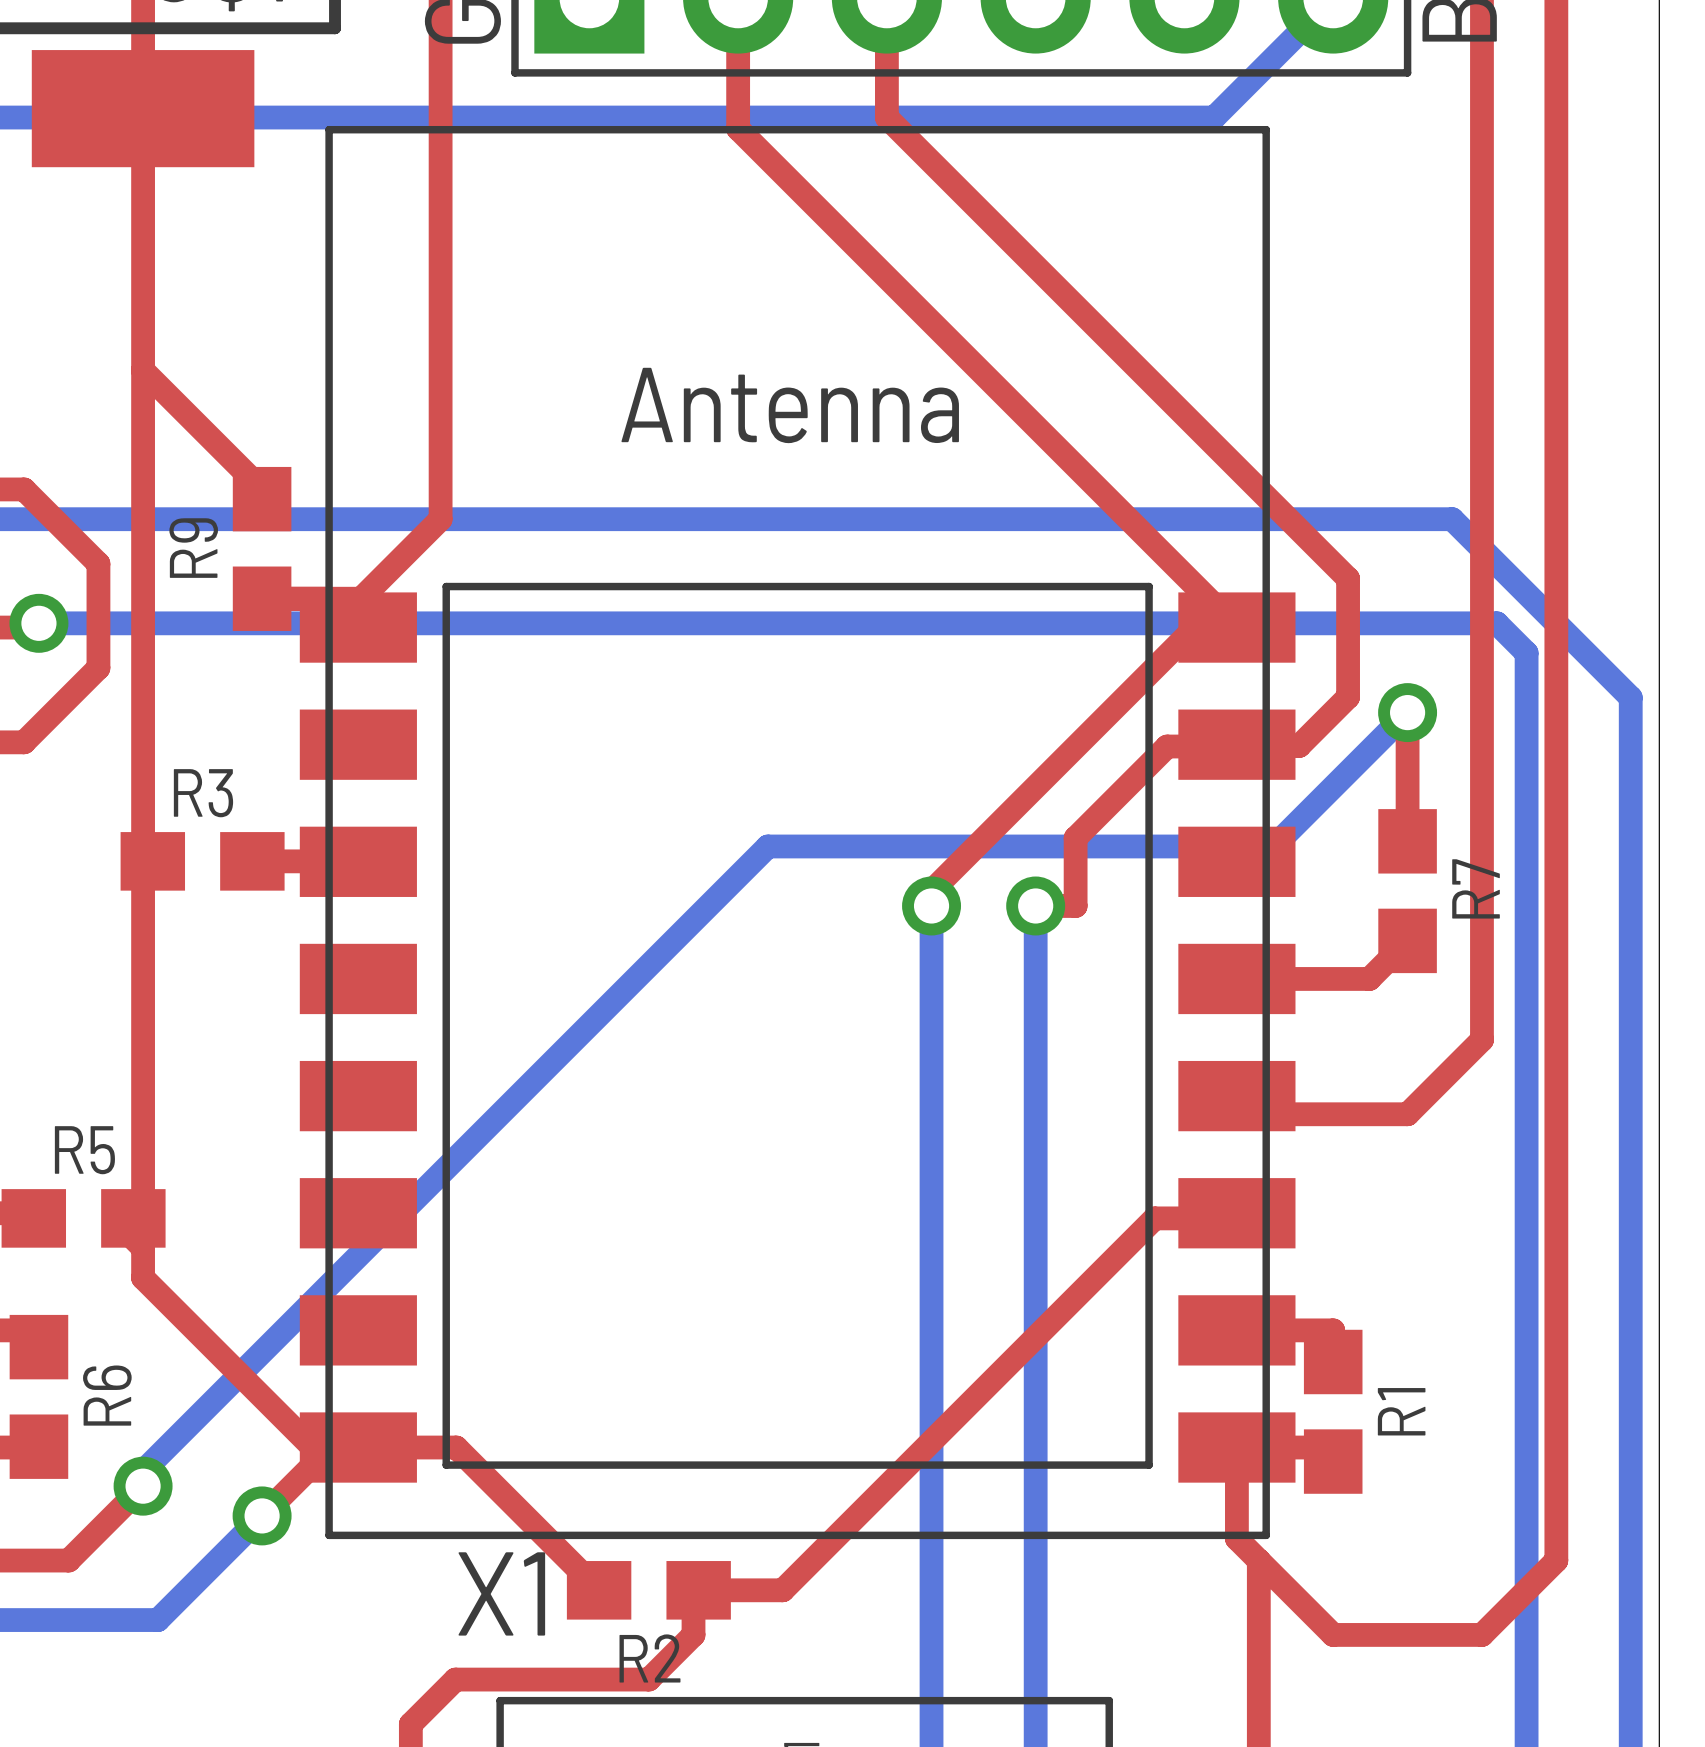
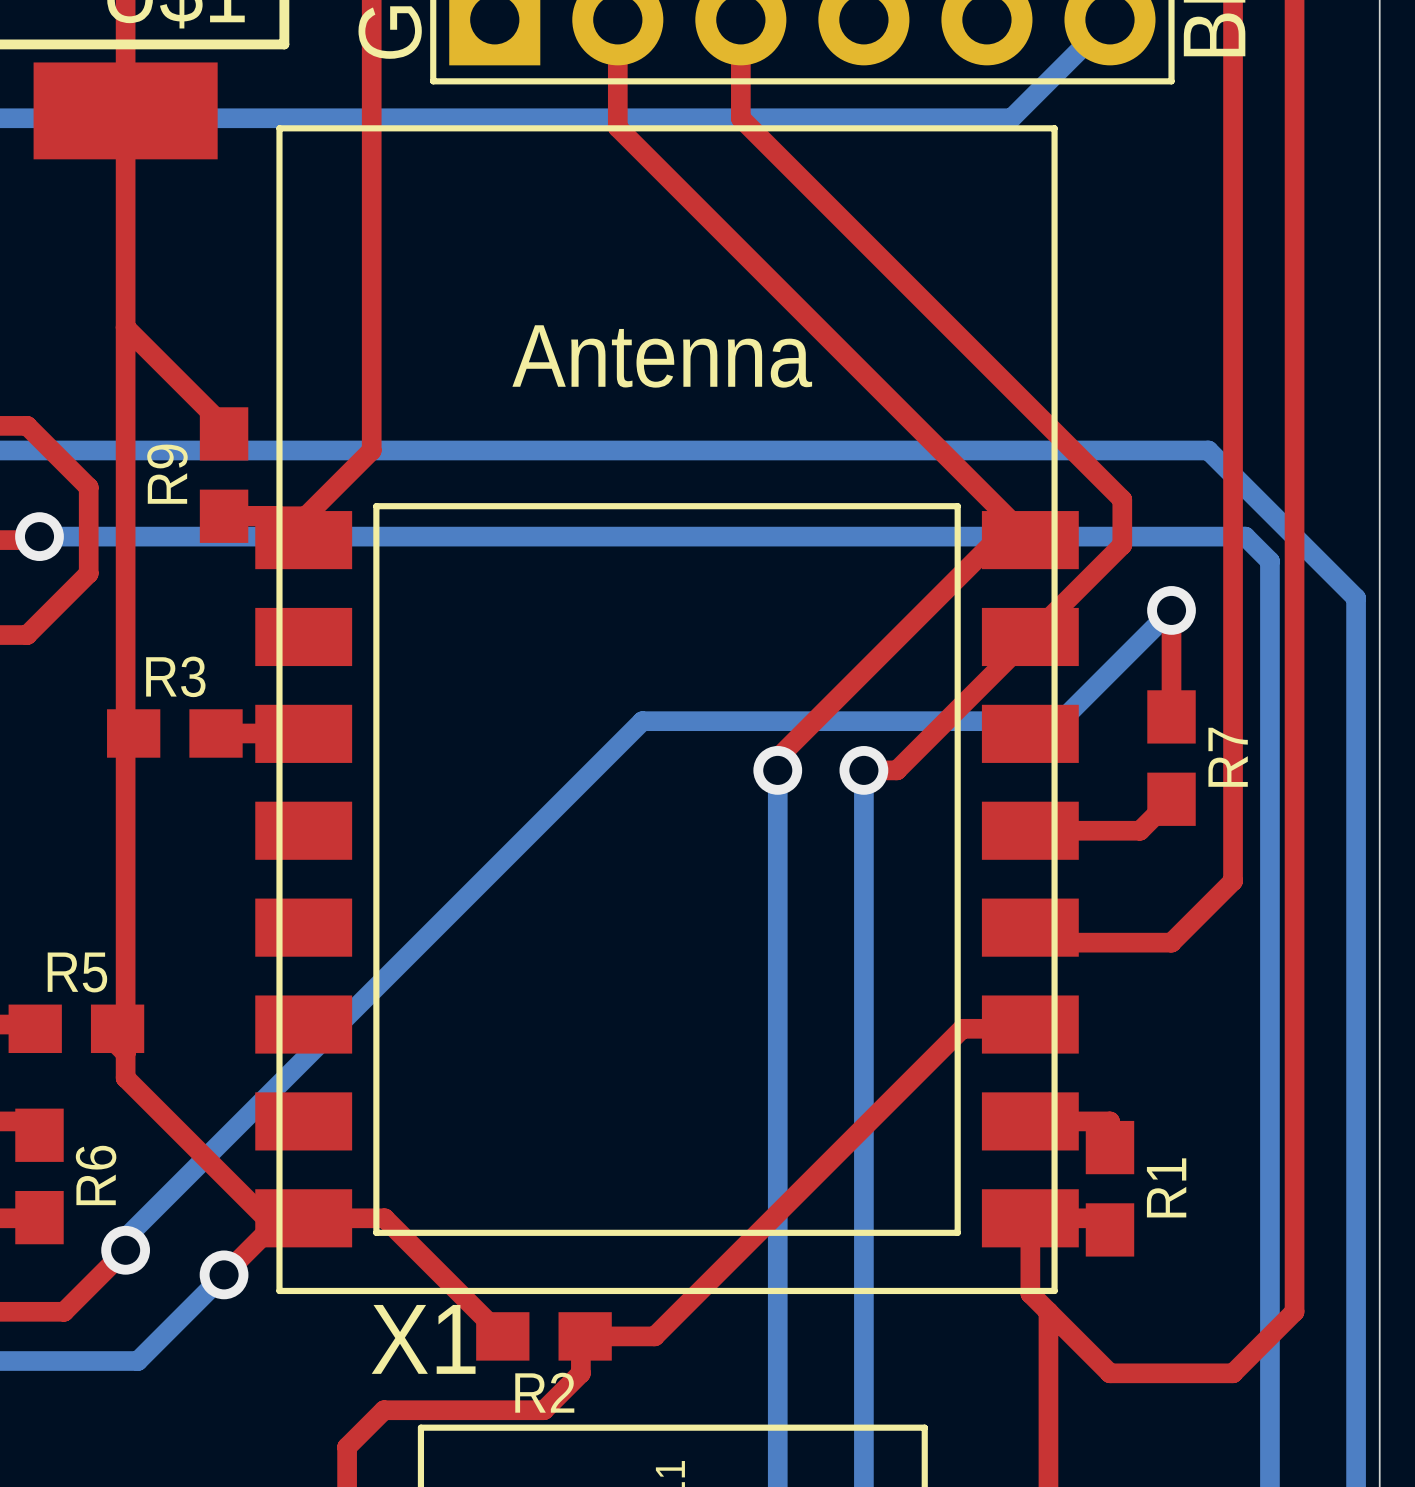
top track: (1348, 633) (1348, 697) (1299, 745) (1236, 744) -> (1122, 545) (1030, 636)
top track: (1235, 746) (1167, 746) (1075, 838) (1075, 905) -> (1028, 638) (896, 770)

